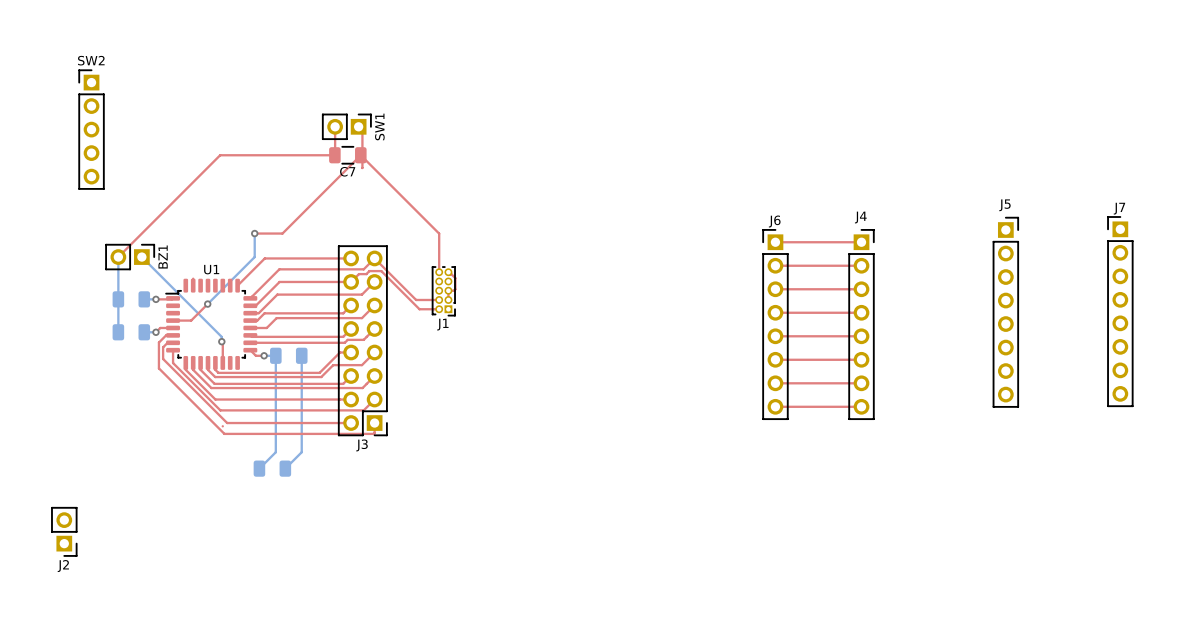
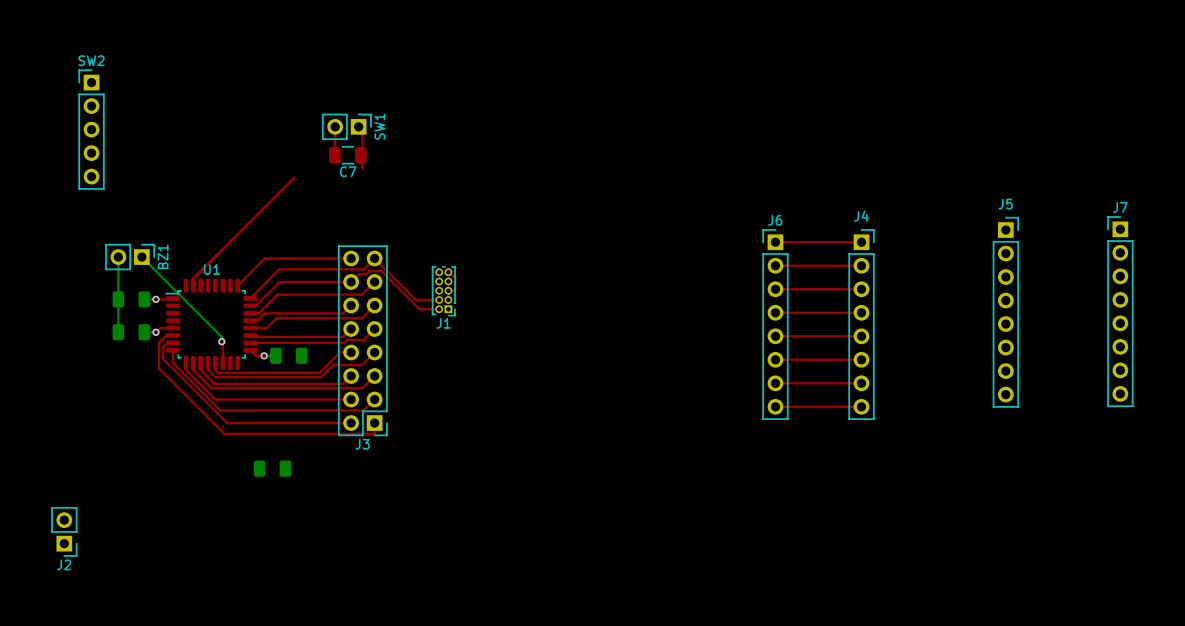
top track: (334, 155) (220, 155) (118, 257) -> none
top track: none -> (294, 177) (193, 278)
bottom track: (254, 233) (254, 257) (207, 304) -> none
top track: (254, 233) (282, 233) (360, 155) (439, 233) (439, 272) -> none
via: (254, 233) -> none
top track: (207, 304) (191, 320) (173, 320) -> none
via: (207, 304) -> none
bottom track: (275, 355) (275, 452) (259, 468) -> none
bottom track: (301, 355) (301, 452) (285, 468) -> none

